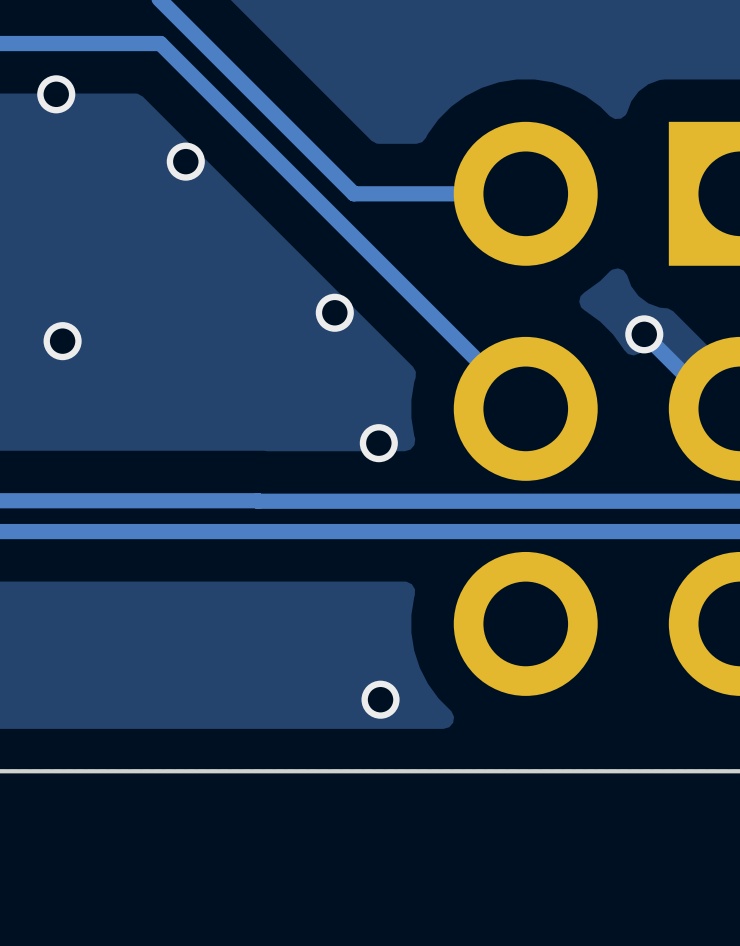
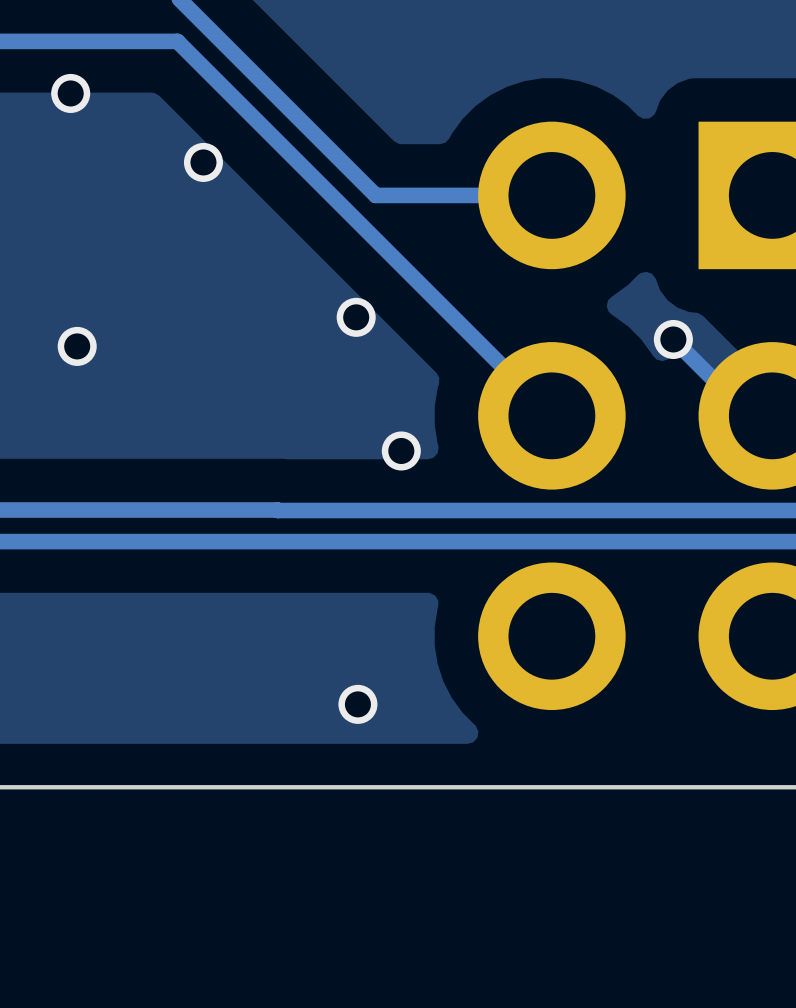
via position: (380, 699) -> (357, 704)

